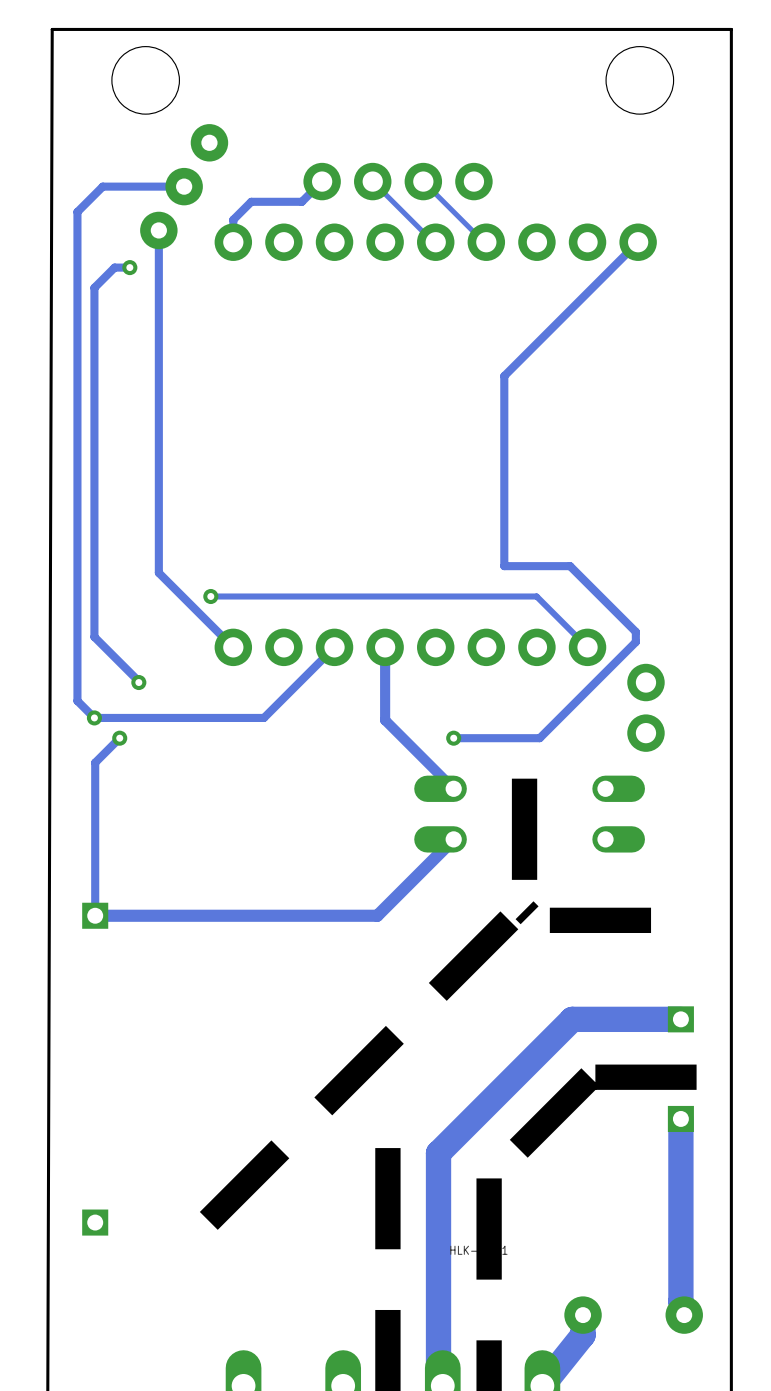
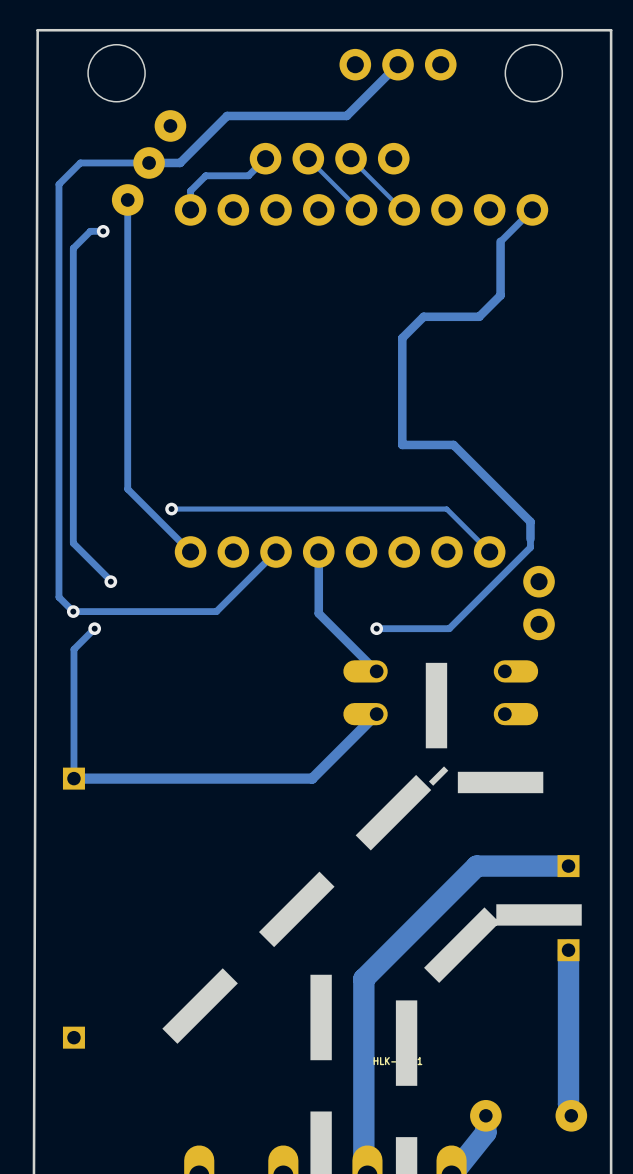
track: none -> (398, 64) (346, 115) (227, 115) (180, 162) (149, 162)
part: none -> (398, 64)
track: (600, 279) (504, 376) (504, 566) (570, 566) (635, 631) -> (500, 241) (500, 295) (479, 316) (423, 316) (402, 338) (402, 444) (453, 444) (530, 521) (530, 538)

